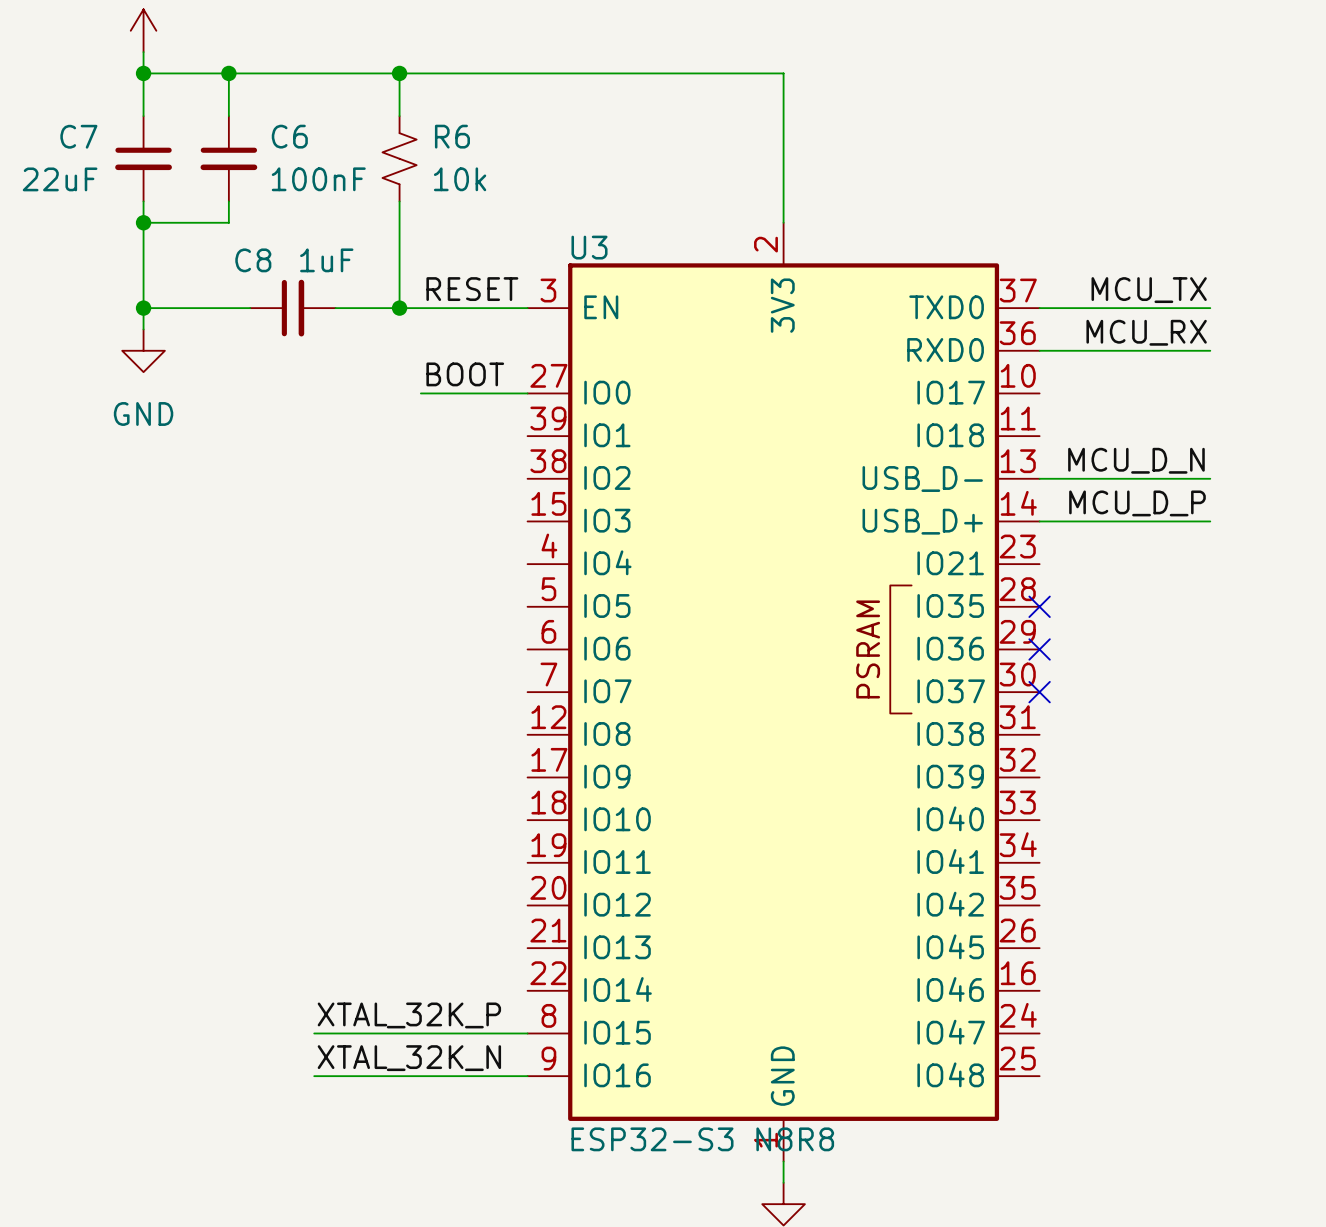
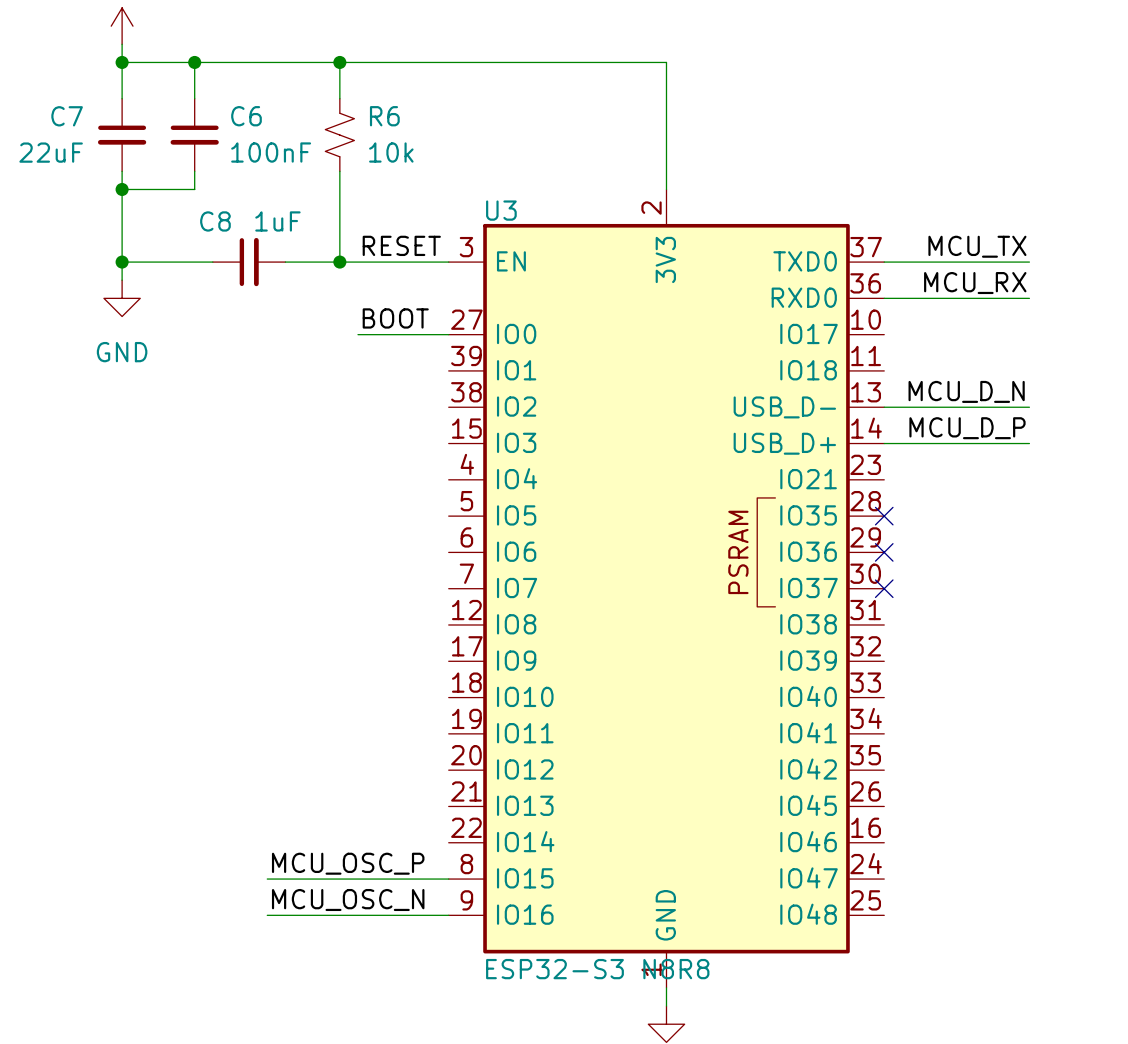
label: XTAL_32K_P (409, 1015) -> MCU_OSC_P (348, 863)
label: XTAL_32K_N (409, 1058) -> MCU_OSC_N (348, 900)

